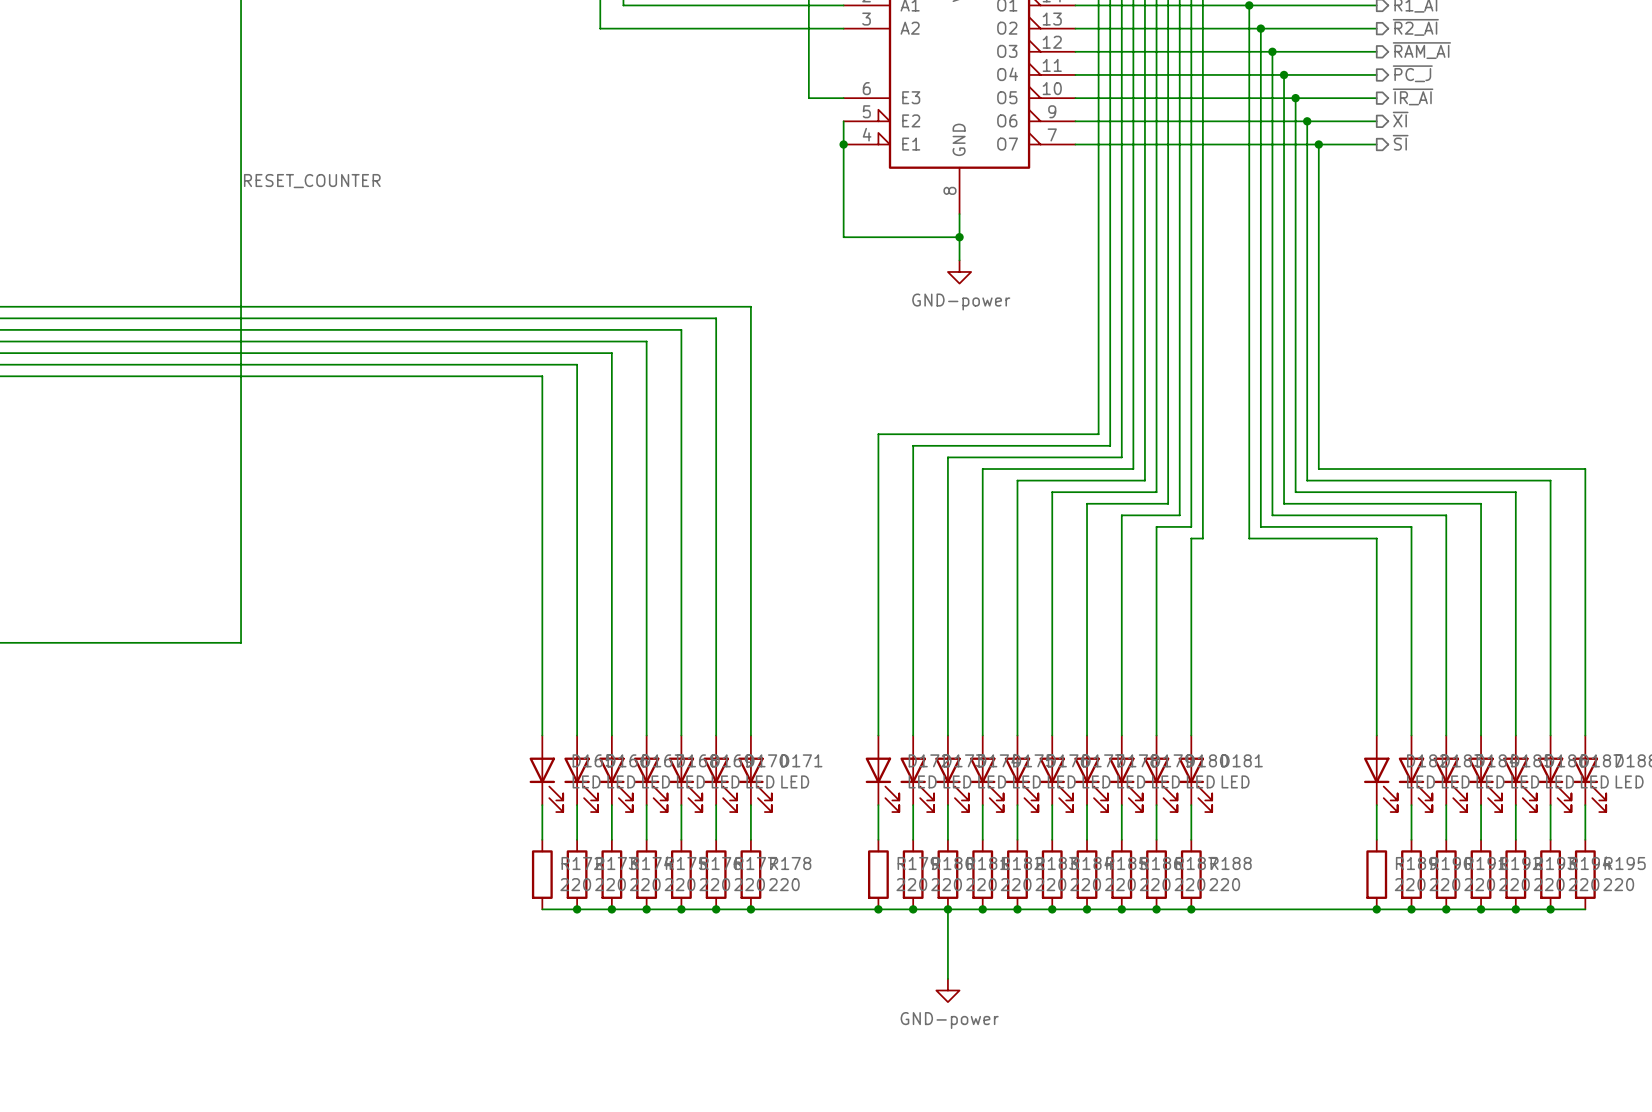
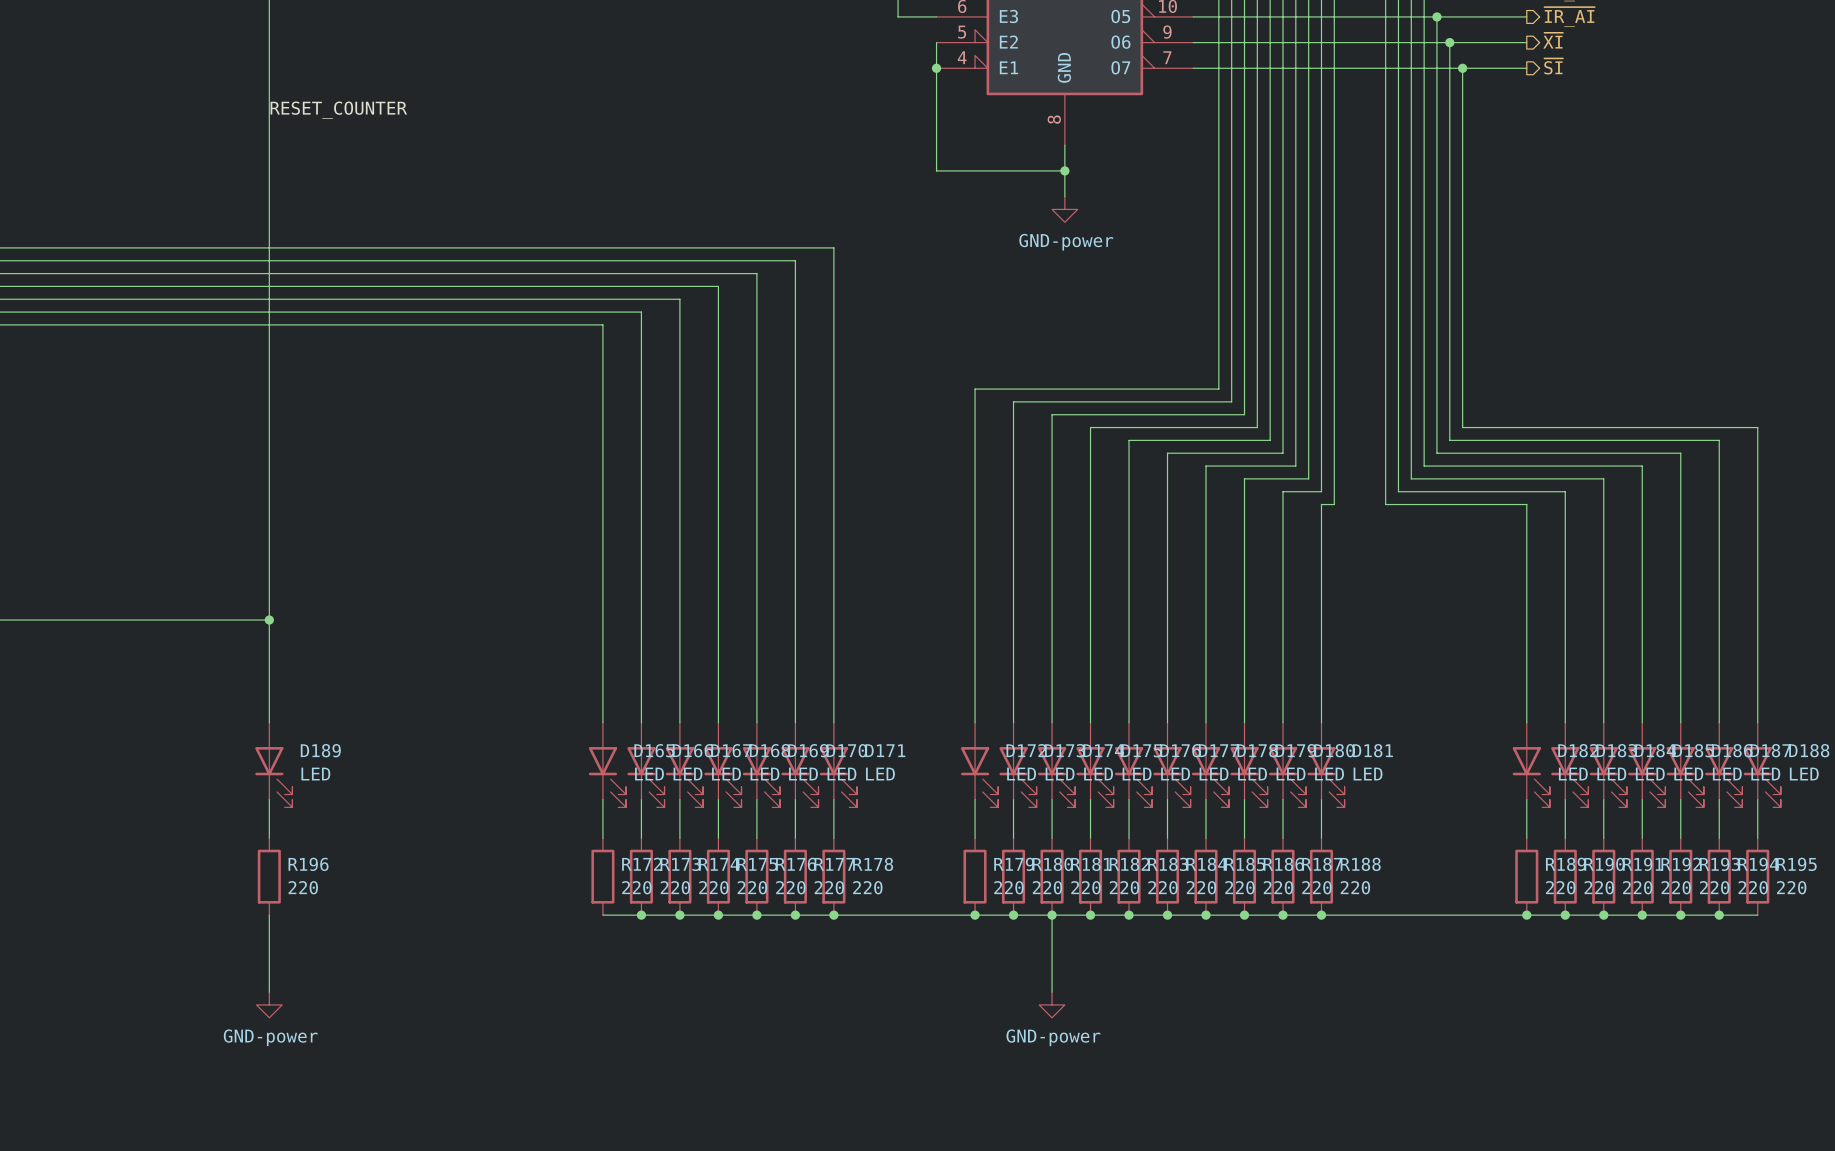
wire: none -> (269, 620) (269, 722)
junction: none -> (269, 620)
D189: none -> LED (273, 765)
wire: none -> (269, 799) (269, 838)
R196: none -> 220 (269, 876)
wire: none -> (269, 915) (269, 992)
power symbol: none -> GND-power (269, 1004)

